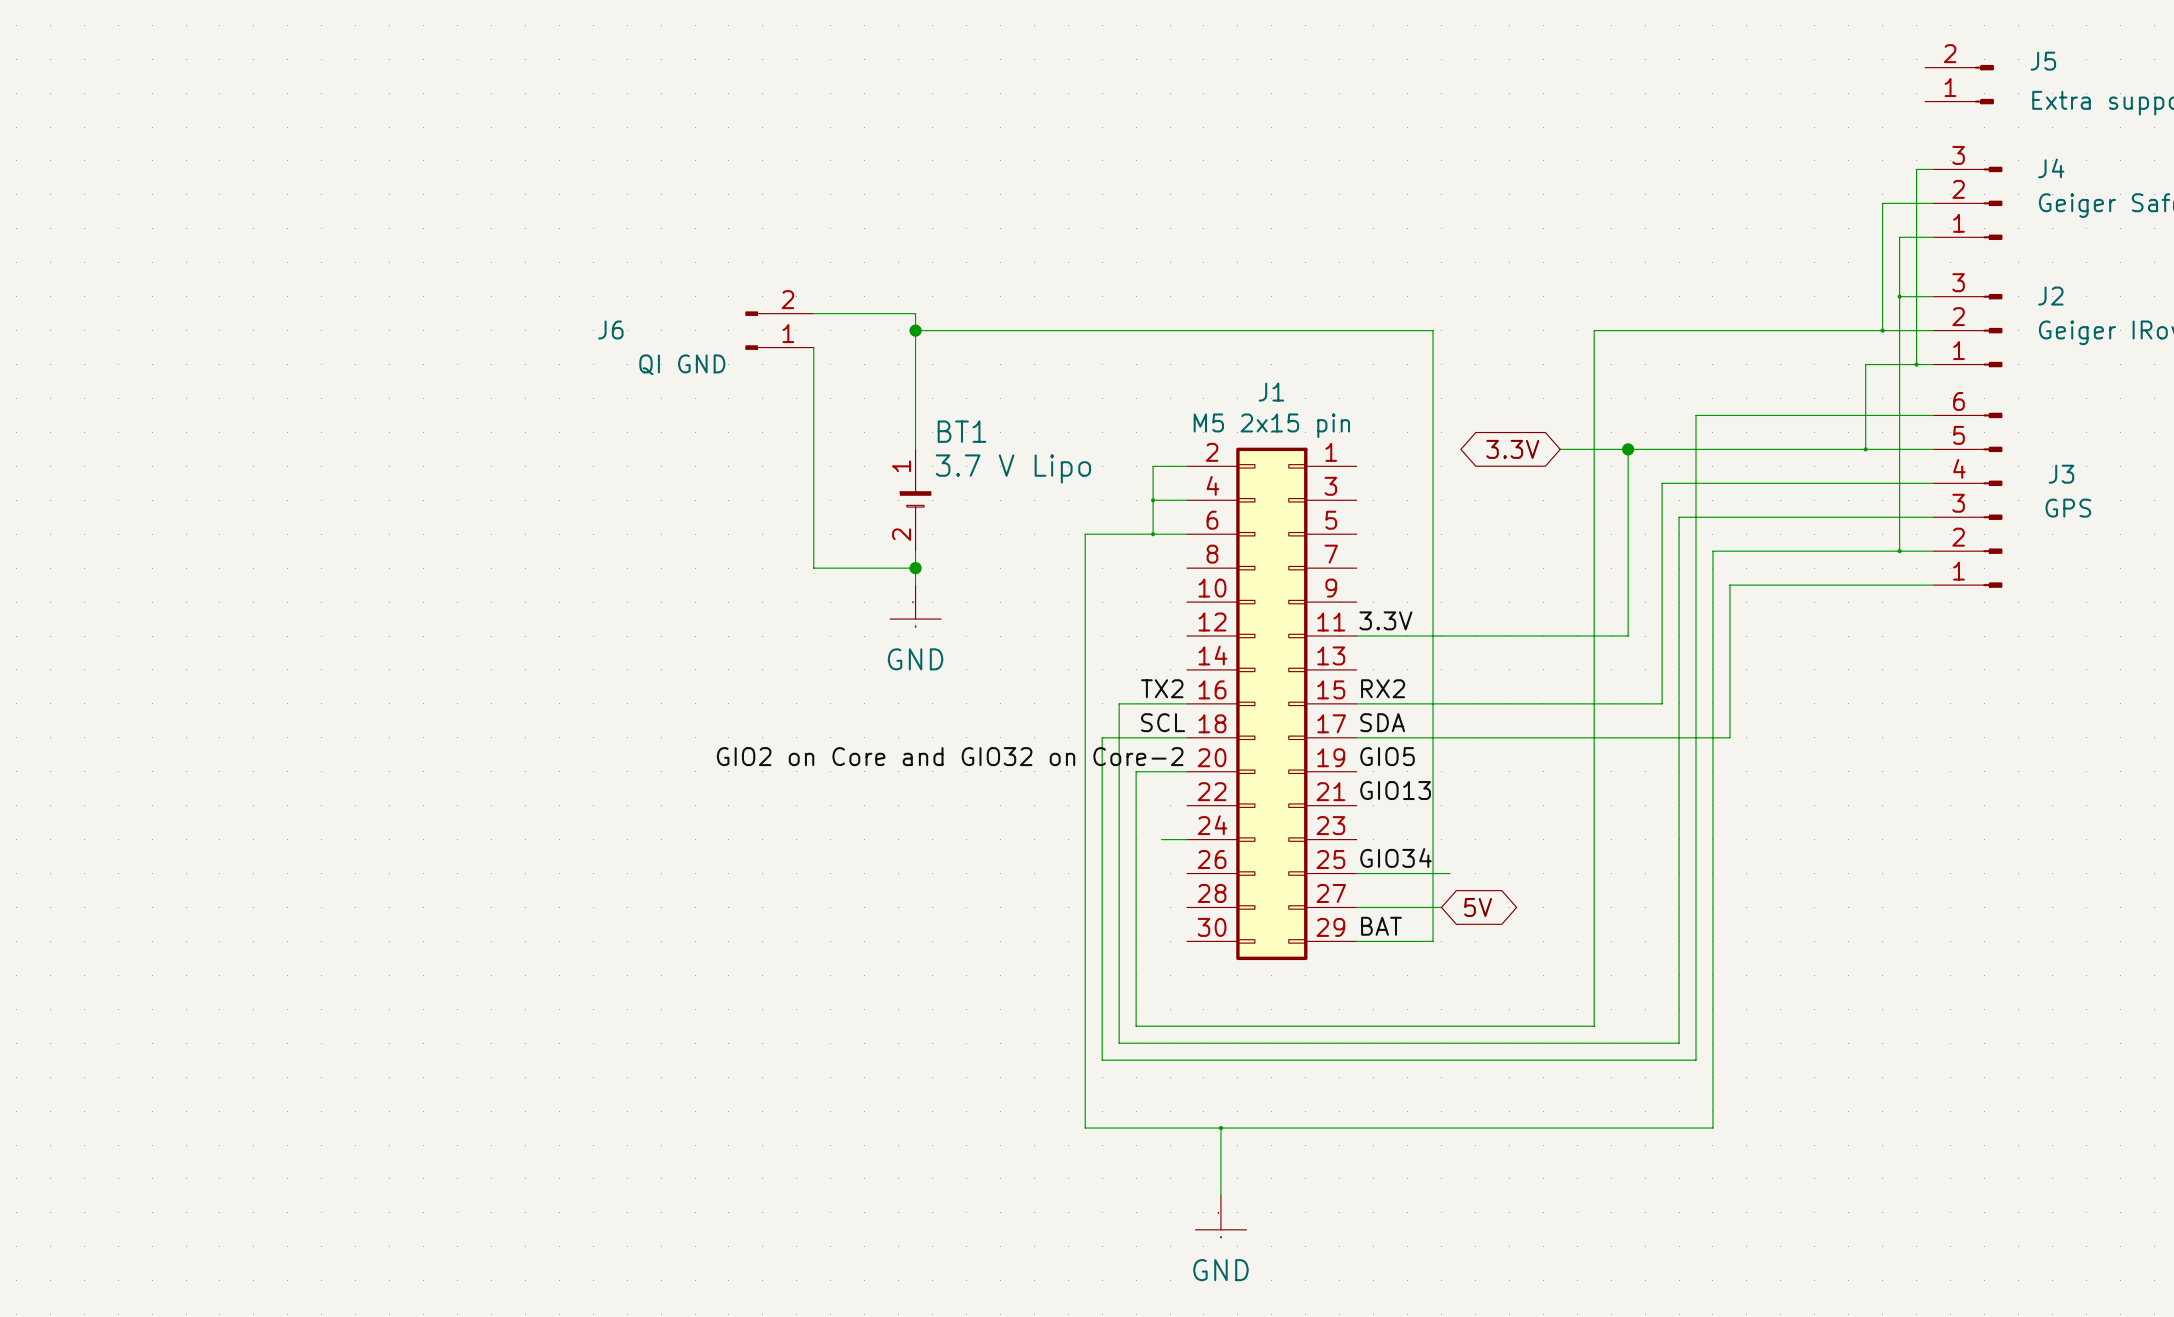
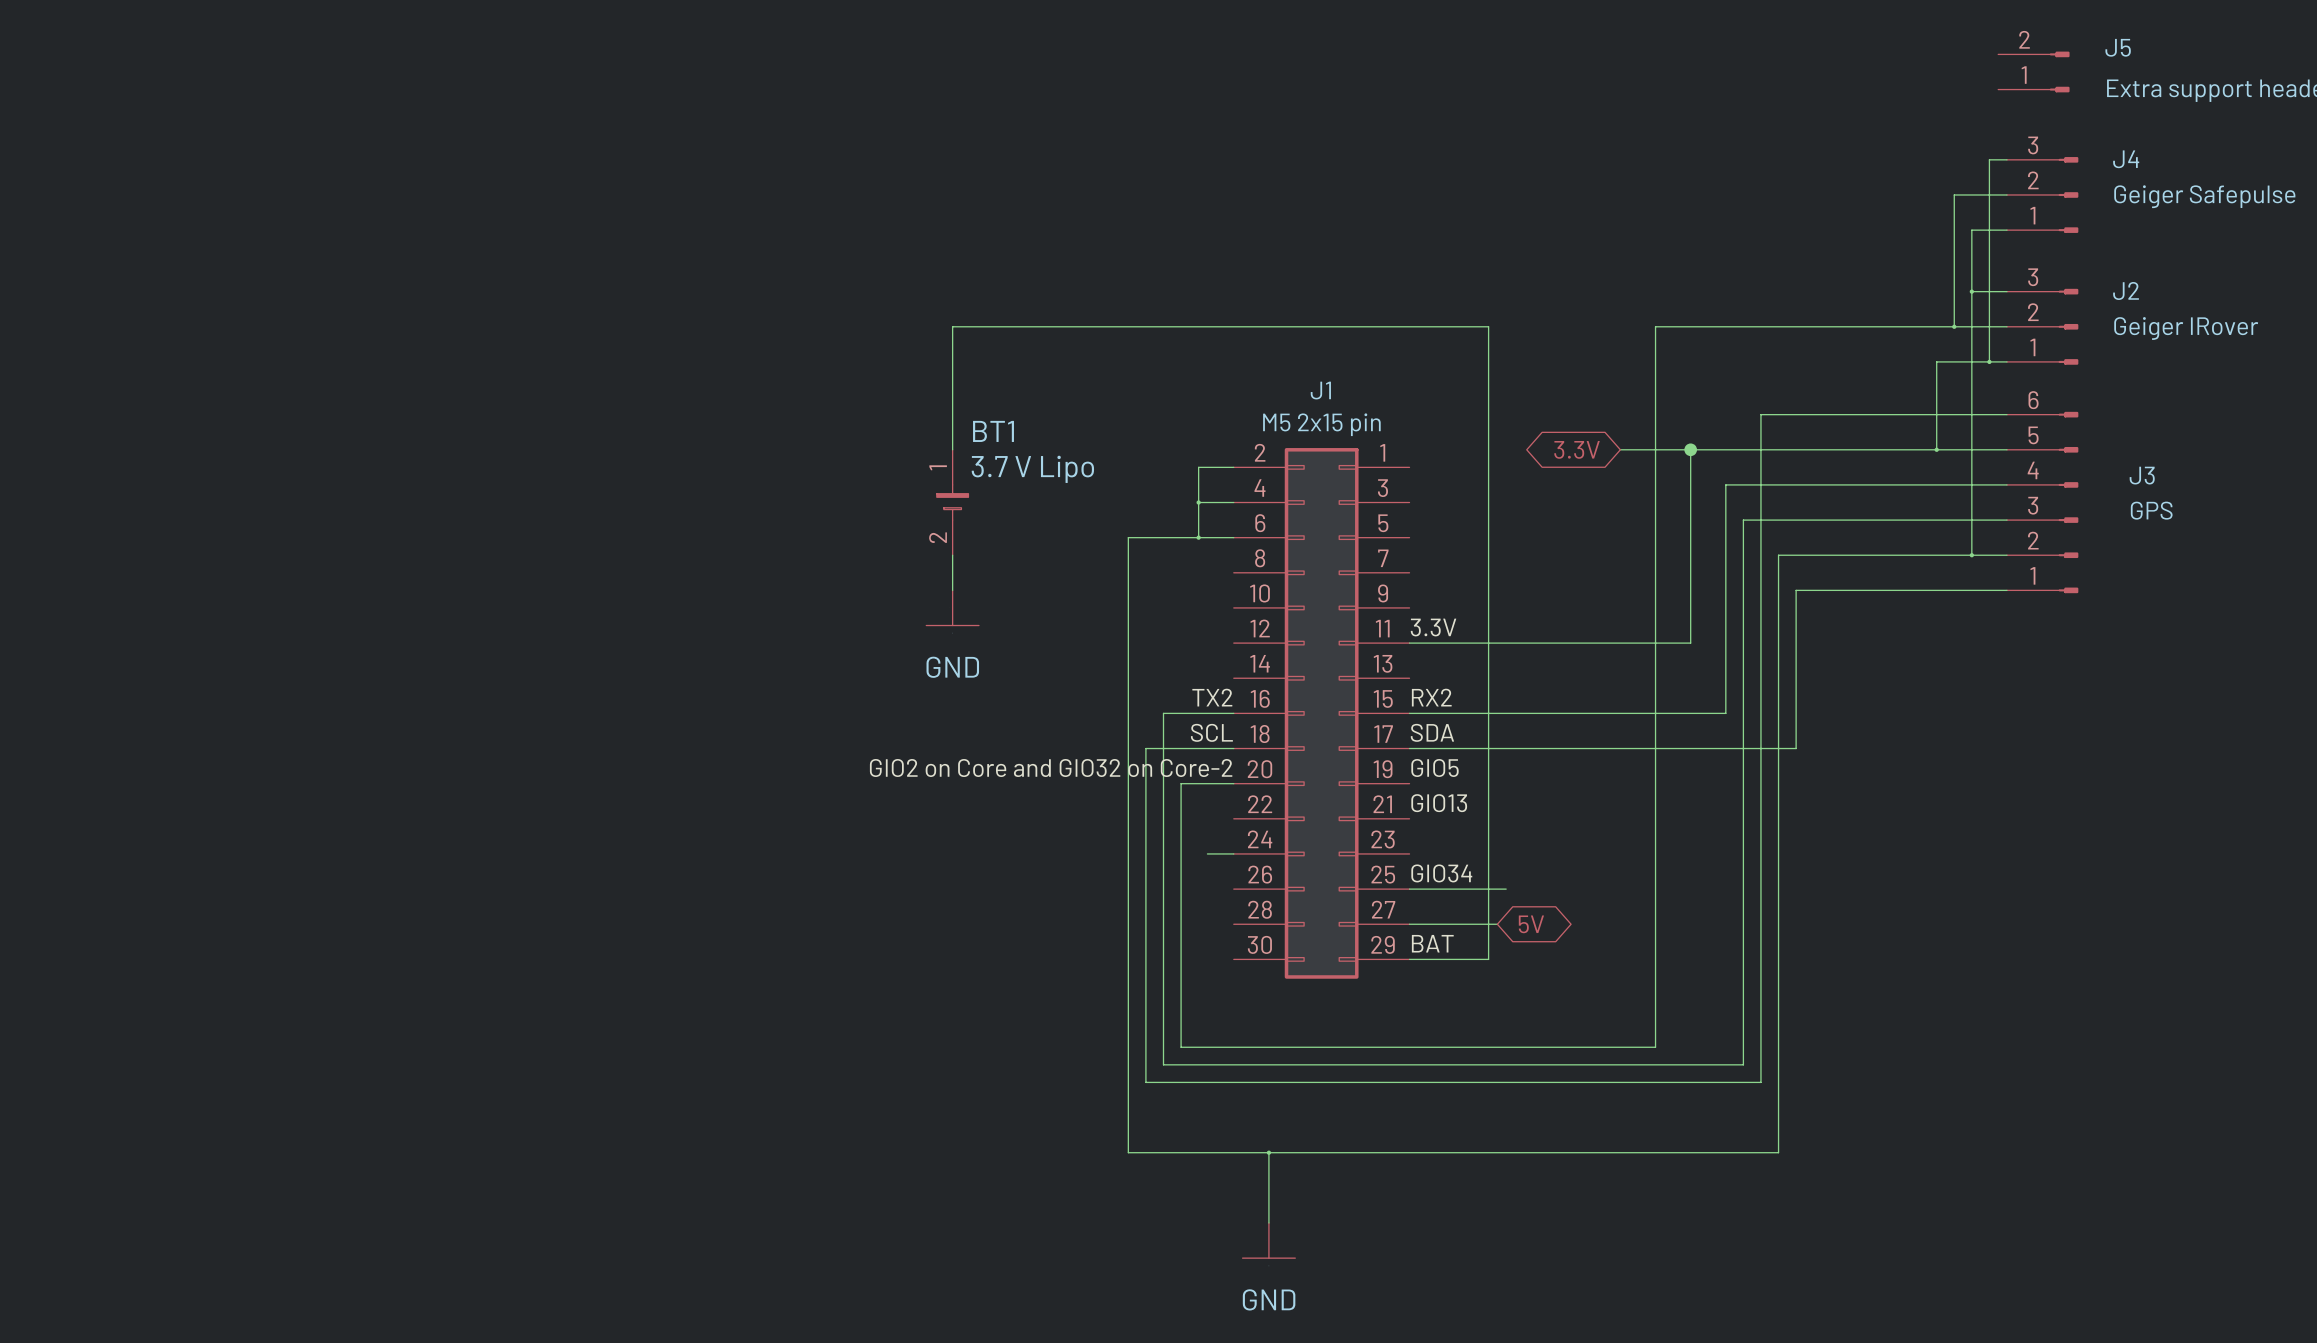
wire: (813, 313) (915, 313) (915, 330) -> none
J6: QI GND (779, 330) -> none
junction: (915, 330) -> none
wire: (813, 347) (813, 568) (915, 568) -> none
junction: (915, 568) -> none

